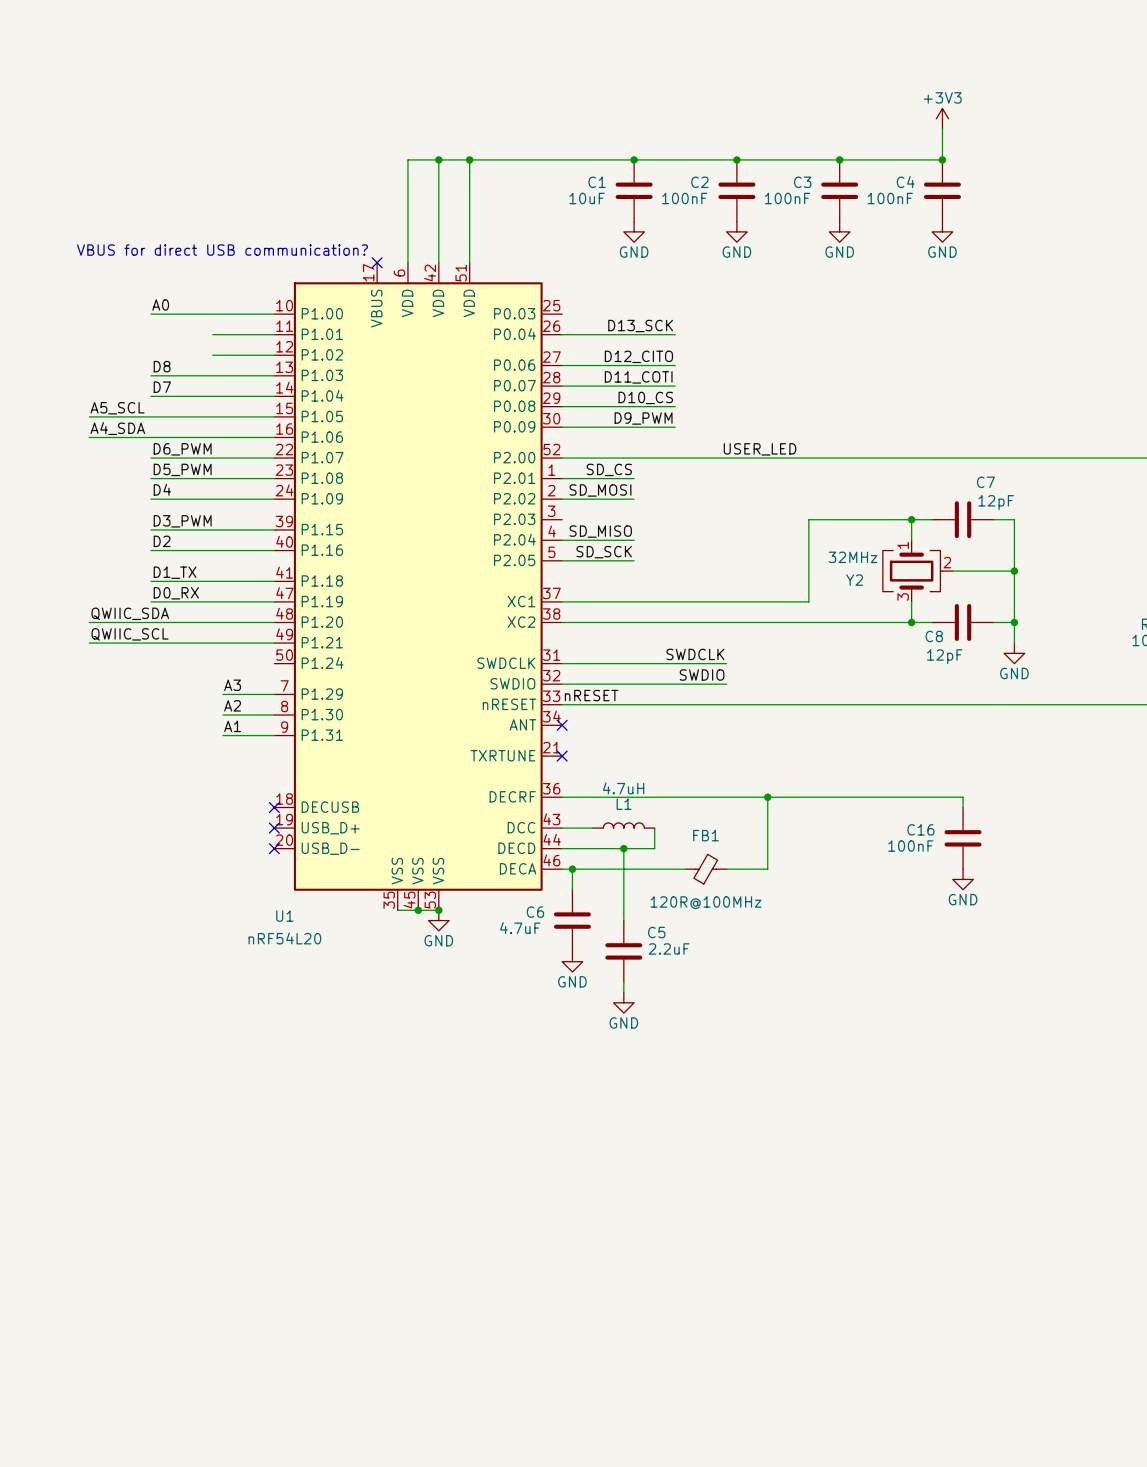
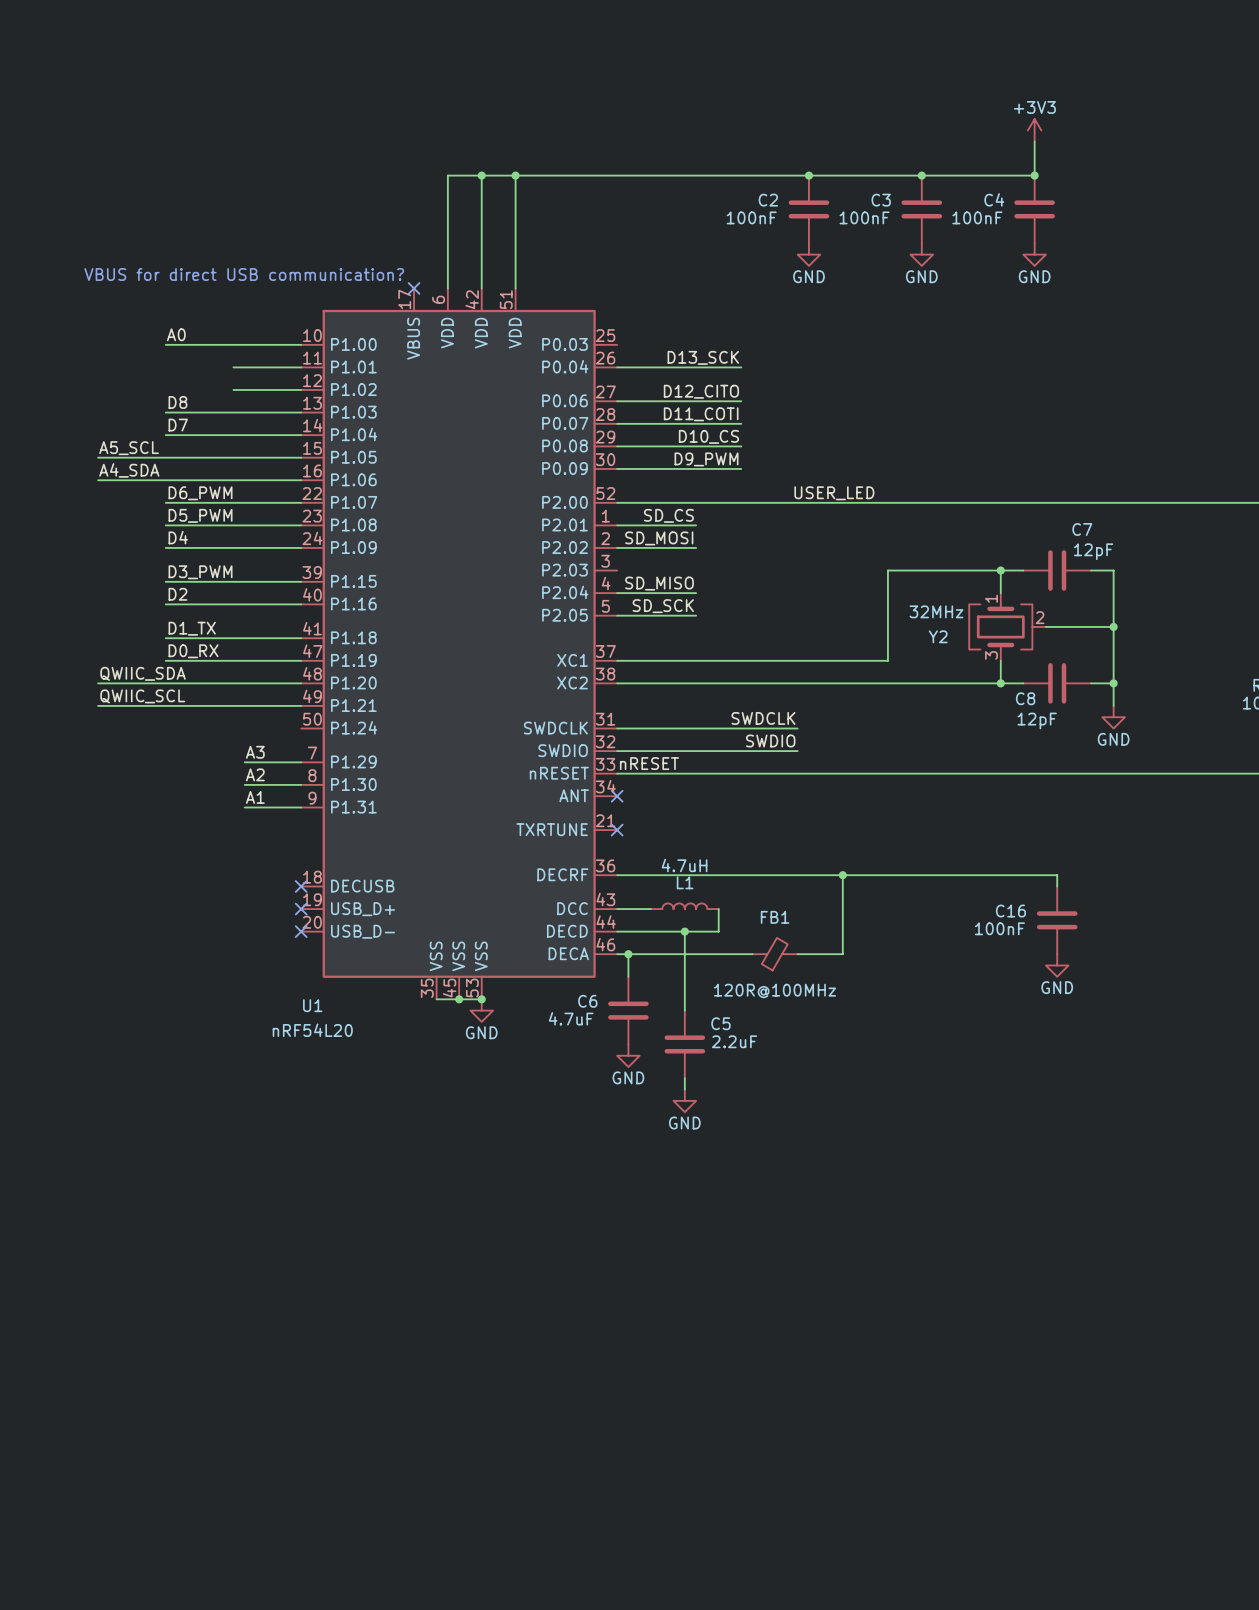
junction: (634, 159) -> none
C1: 10uF (634, 190) -> none
power symbol: GND (634, 231) -> none

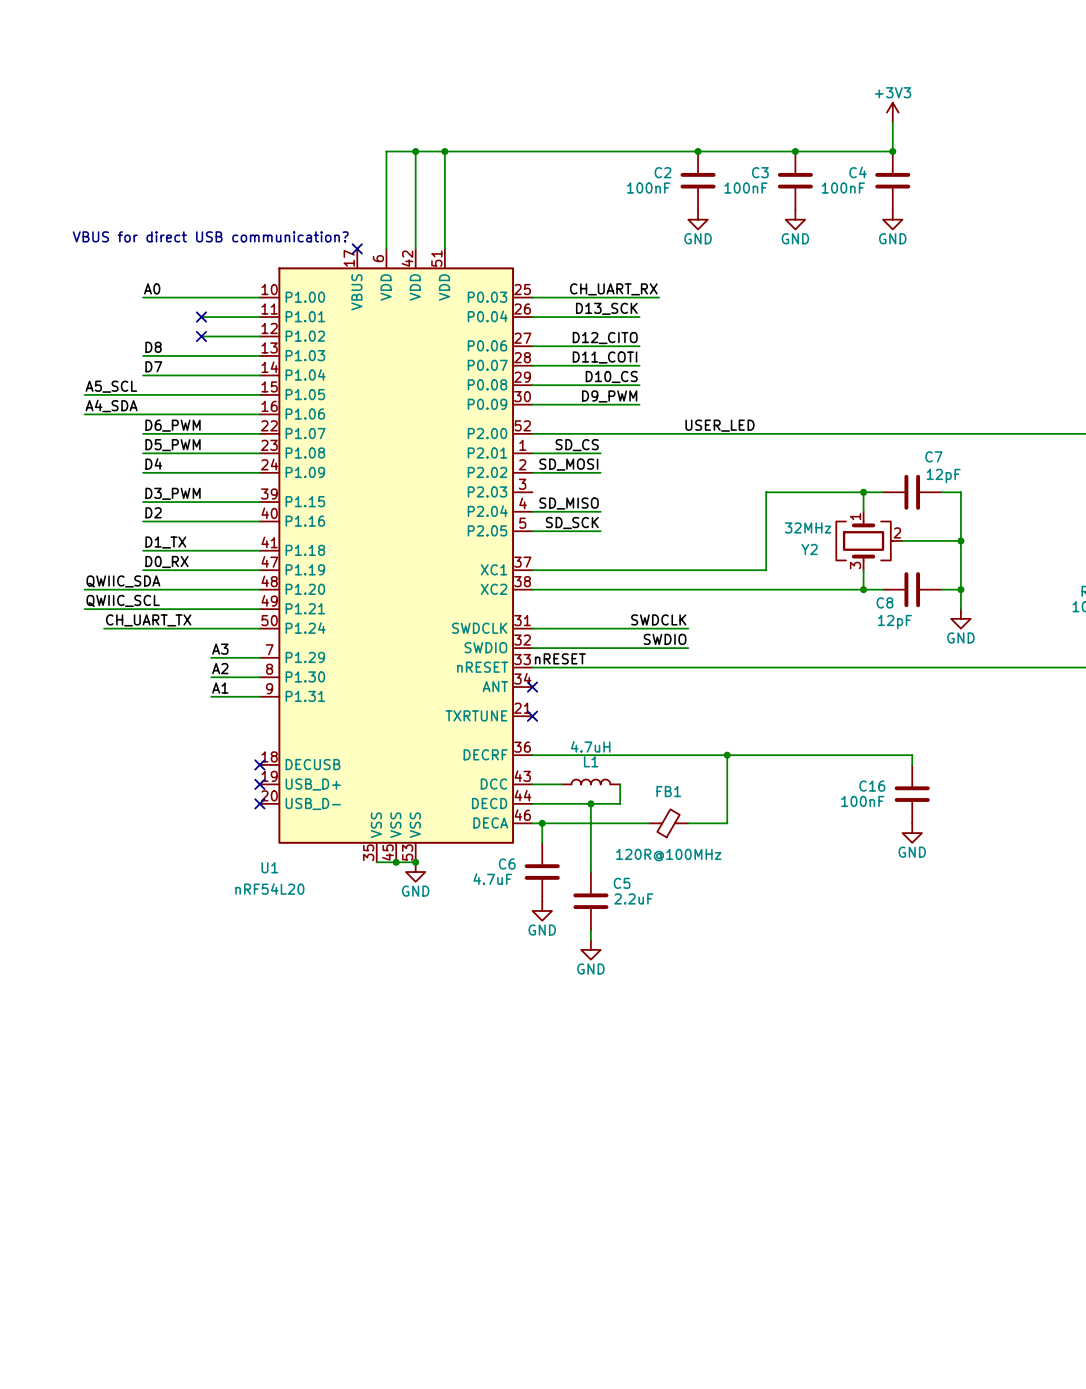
label: none -> CH_UART_RX (613, 289)
wire: none -> (532, 297) (659, 297)
no-connect mark: none -> (201, 317)
no-connect mark: none -> (201, 336)
label: none -> CH_UART_TX (148, 620)
wire: none -> (104, 628) (259, 628)

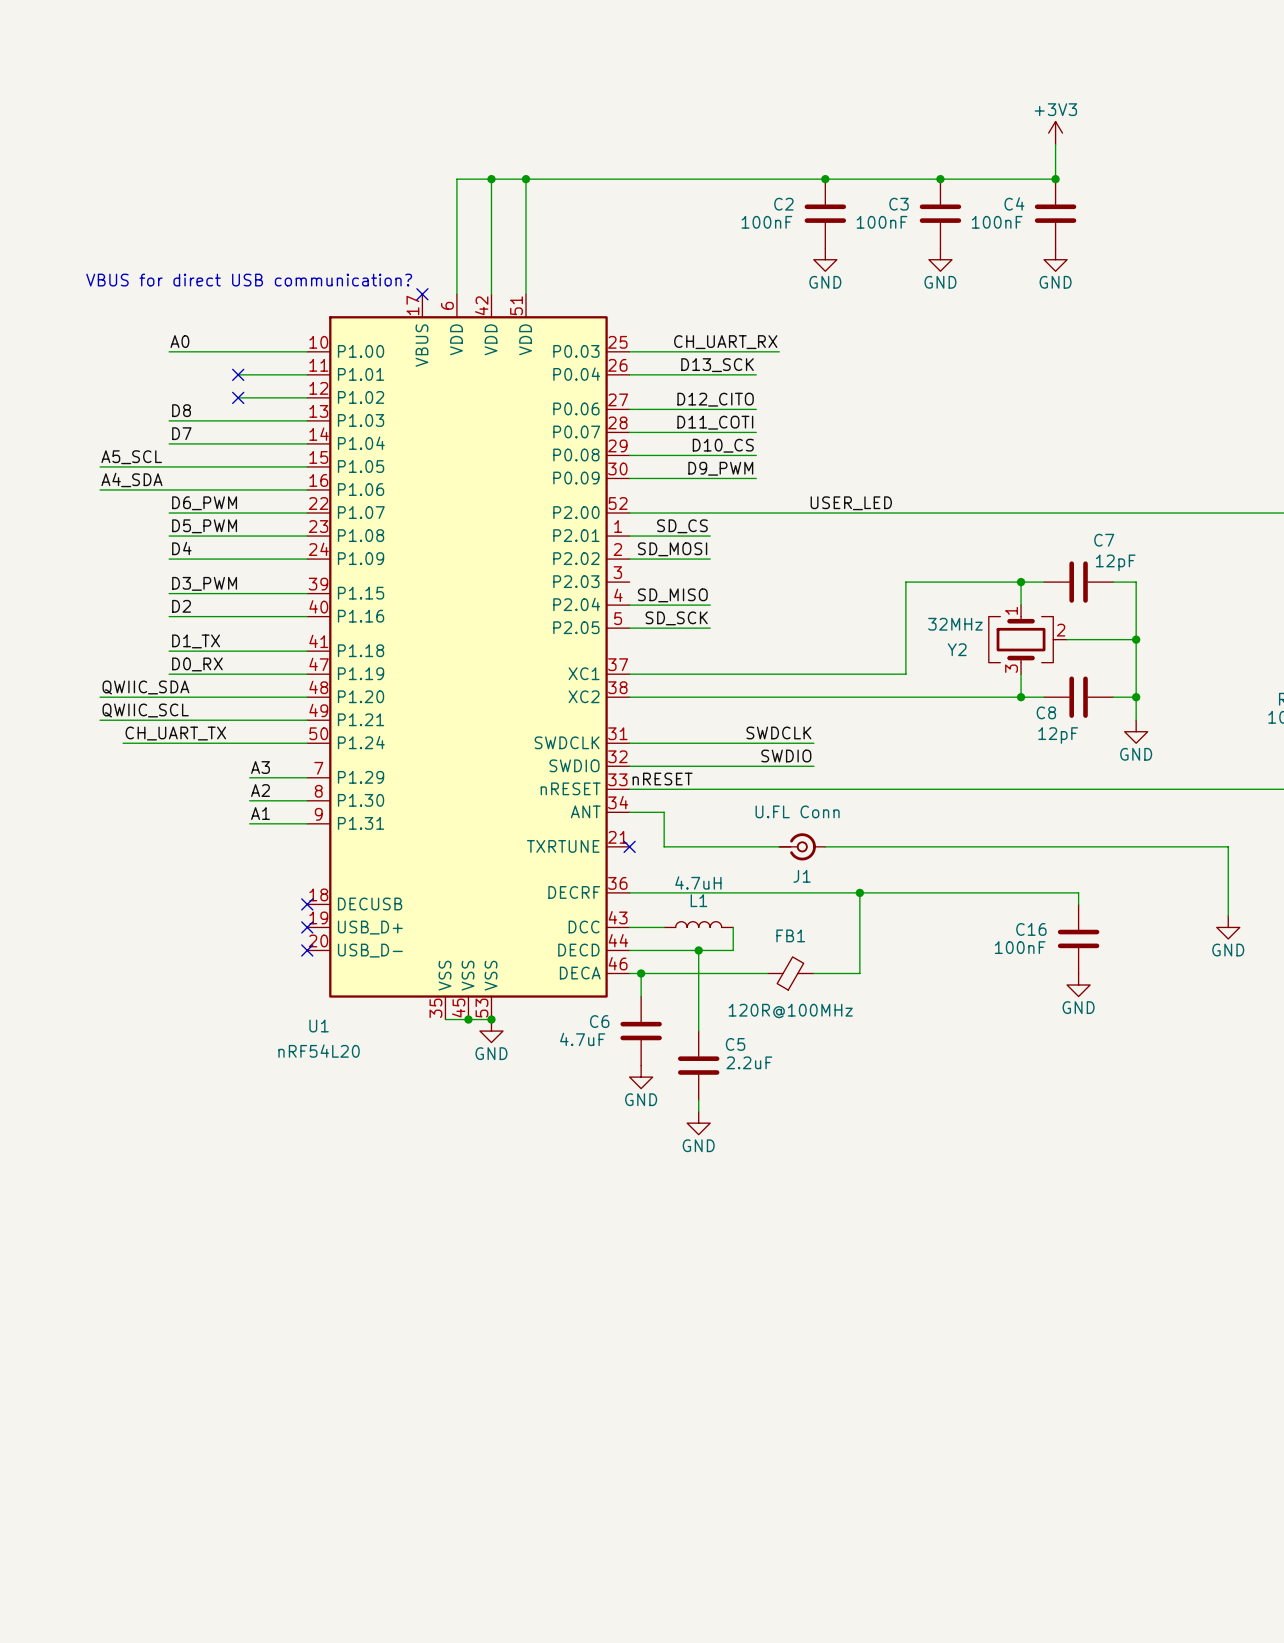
wire: none -> (629, 812) (664, 812) (664, 846) (779, 846)
no-connect mark: (532, 687) -> none
J1: none -> U.FL Conn (802, 846)
wire: none -> (825, 846) (1228, 846) (1228, 915)
power symbol: none -> GND (1228, 927)

